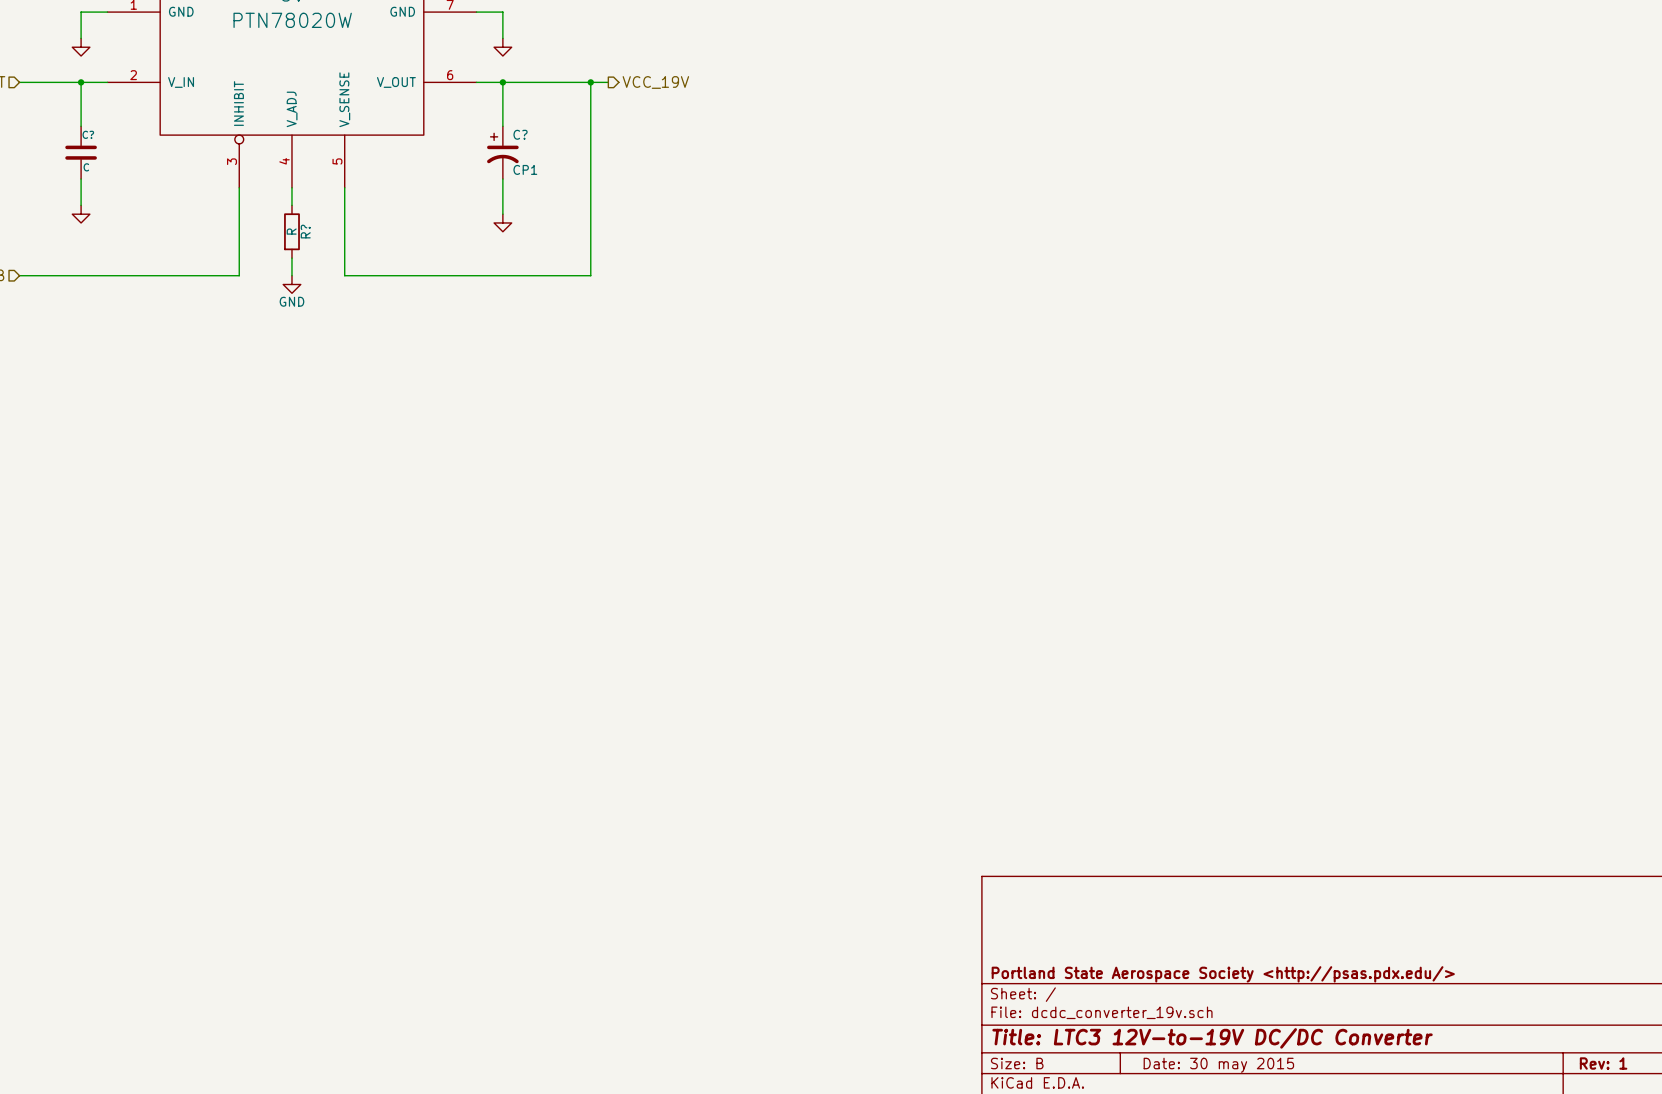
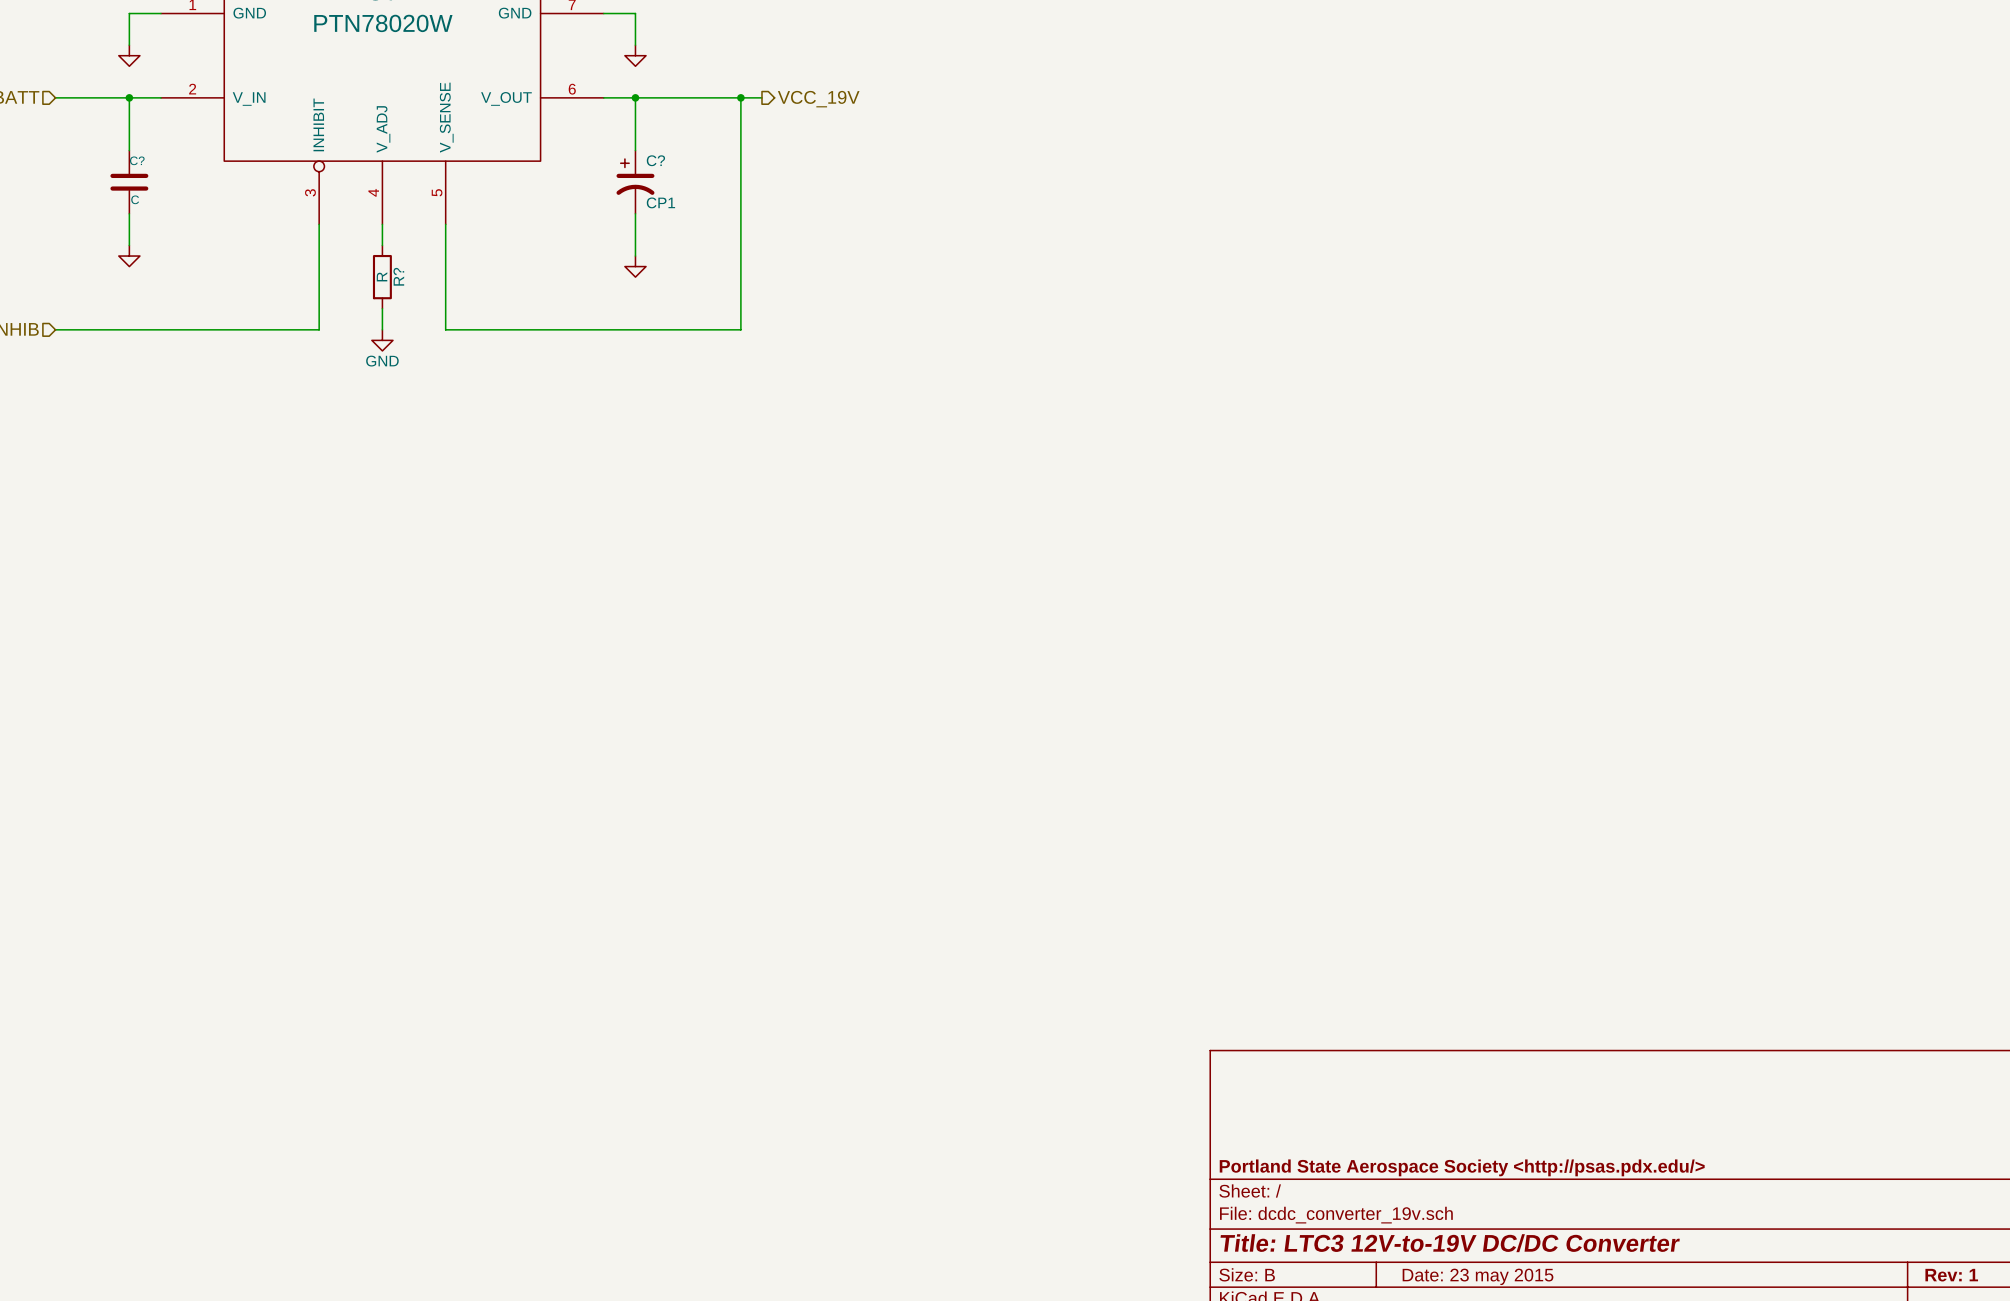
title block: Date: 30 may 2015 (1218, 1065) -> Date: 23 may 2015 (1478, 1276)

